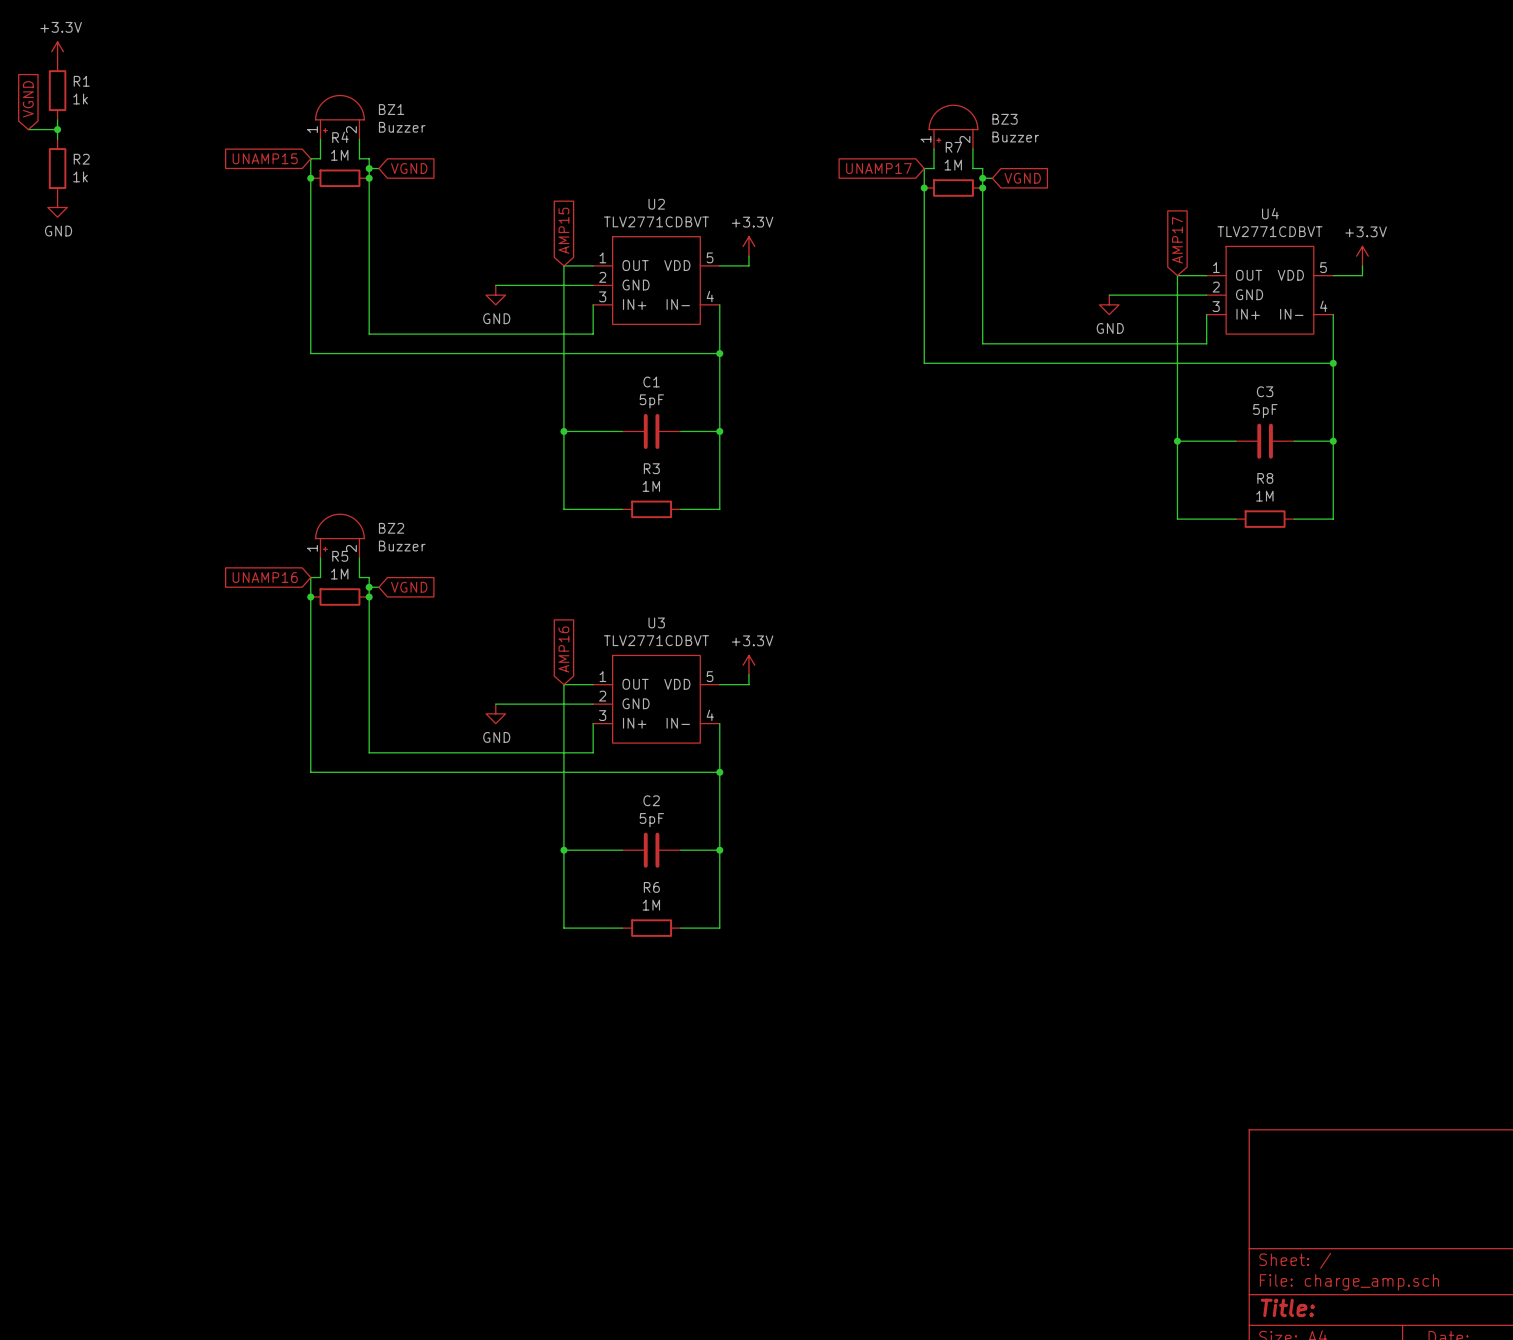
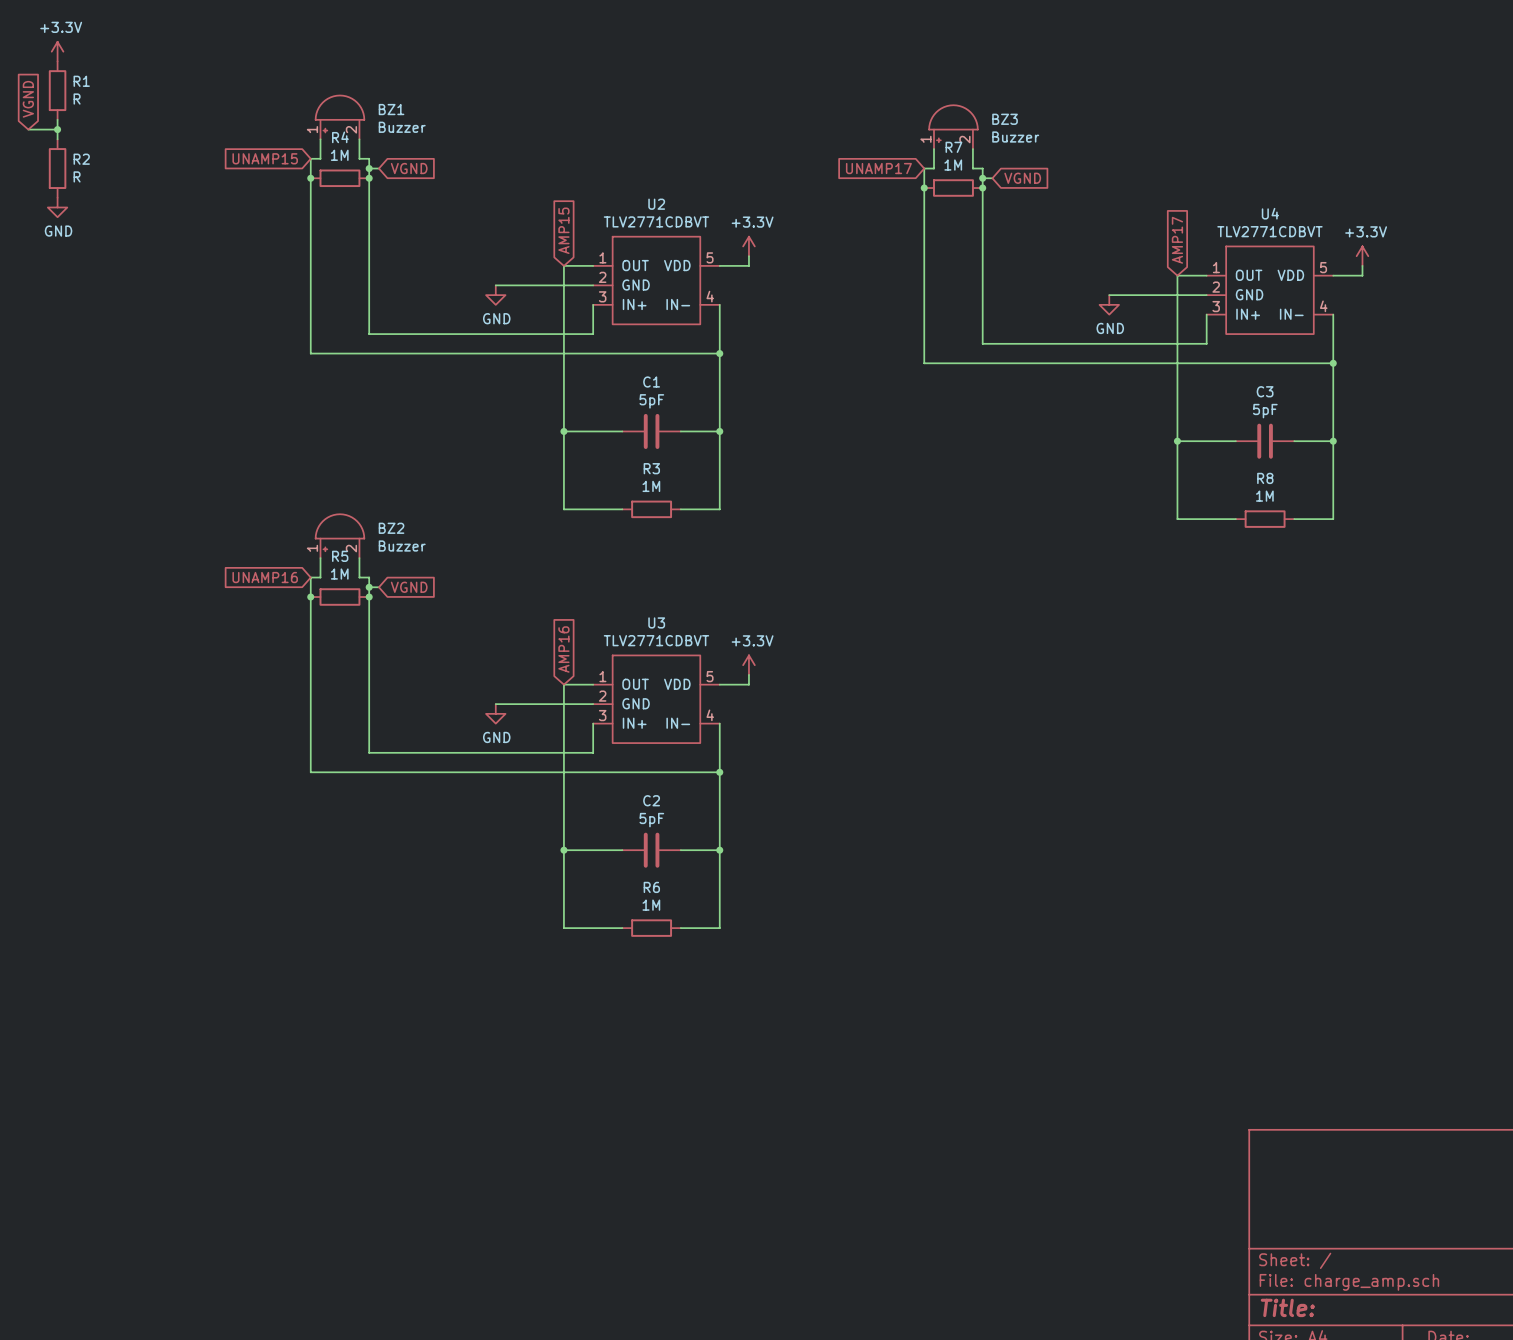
R1 value: 1k (80, 99) -> R (77, 99)
R2 value: 1k (80, 176) -> R (77, 176)

